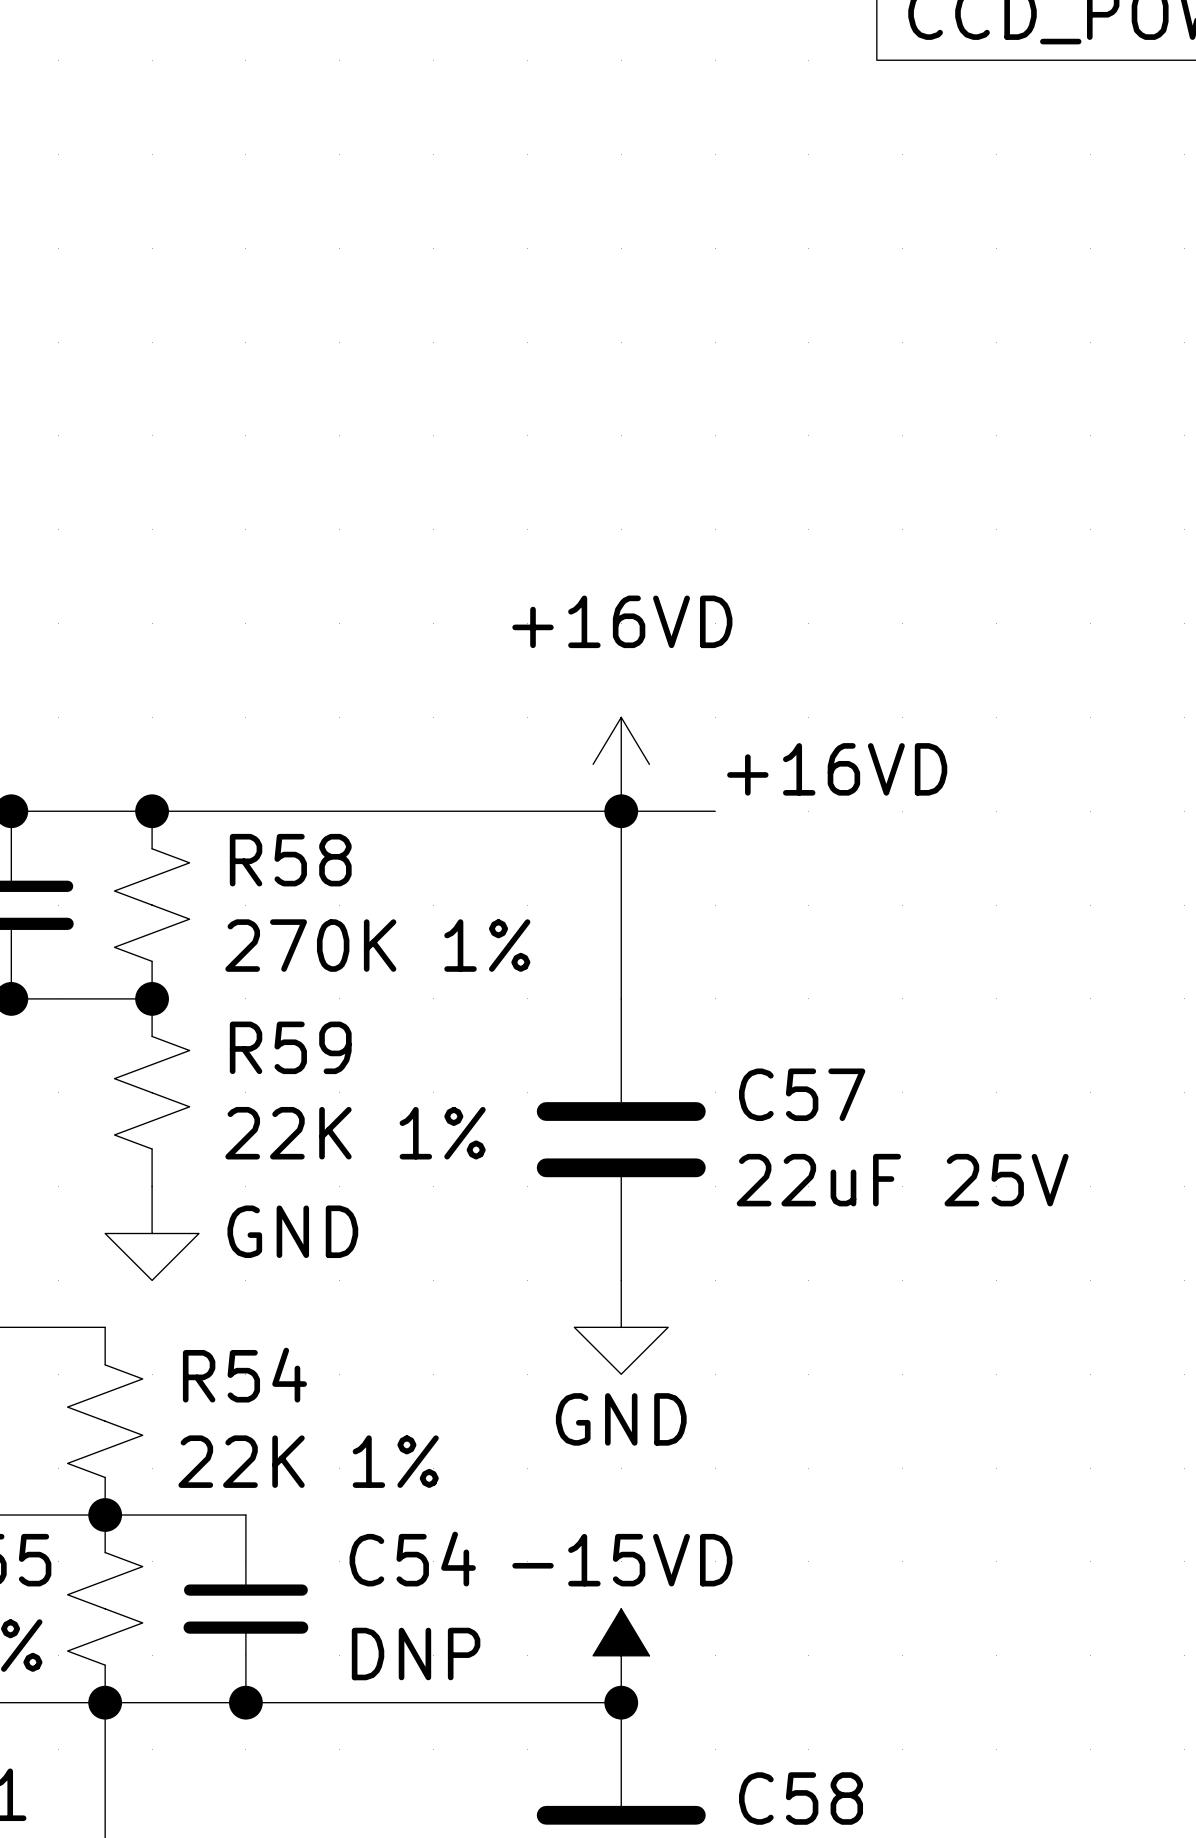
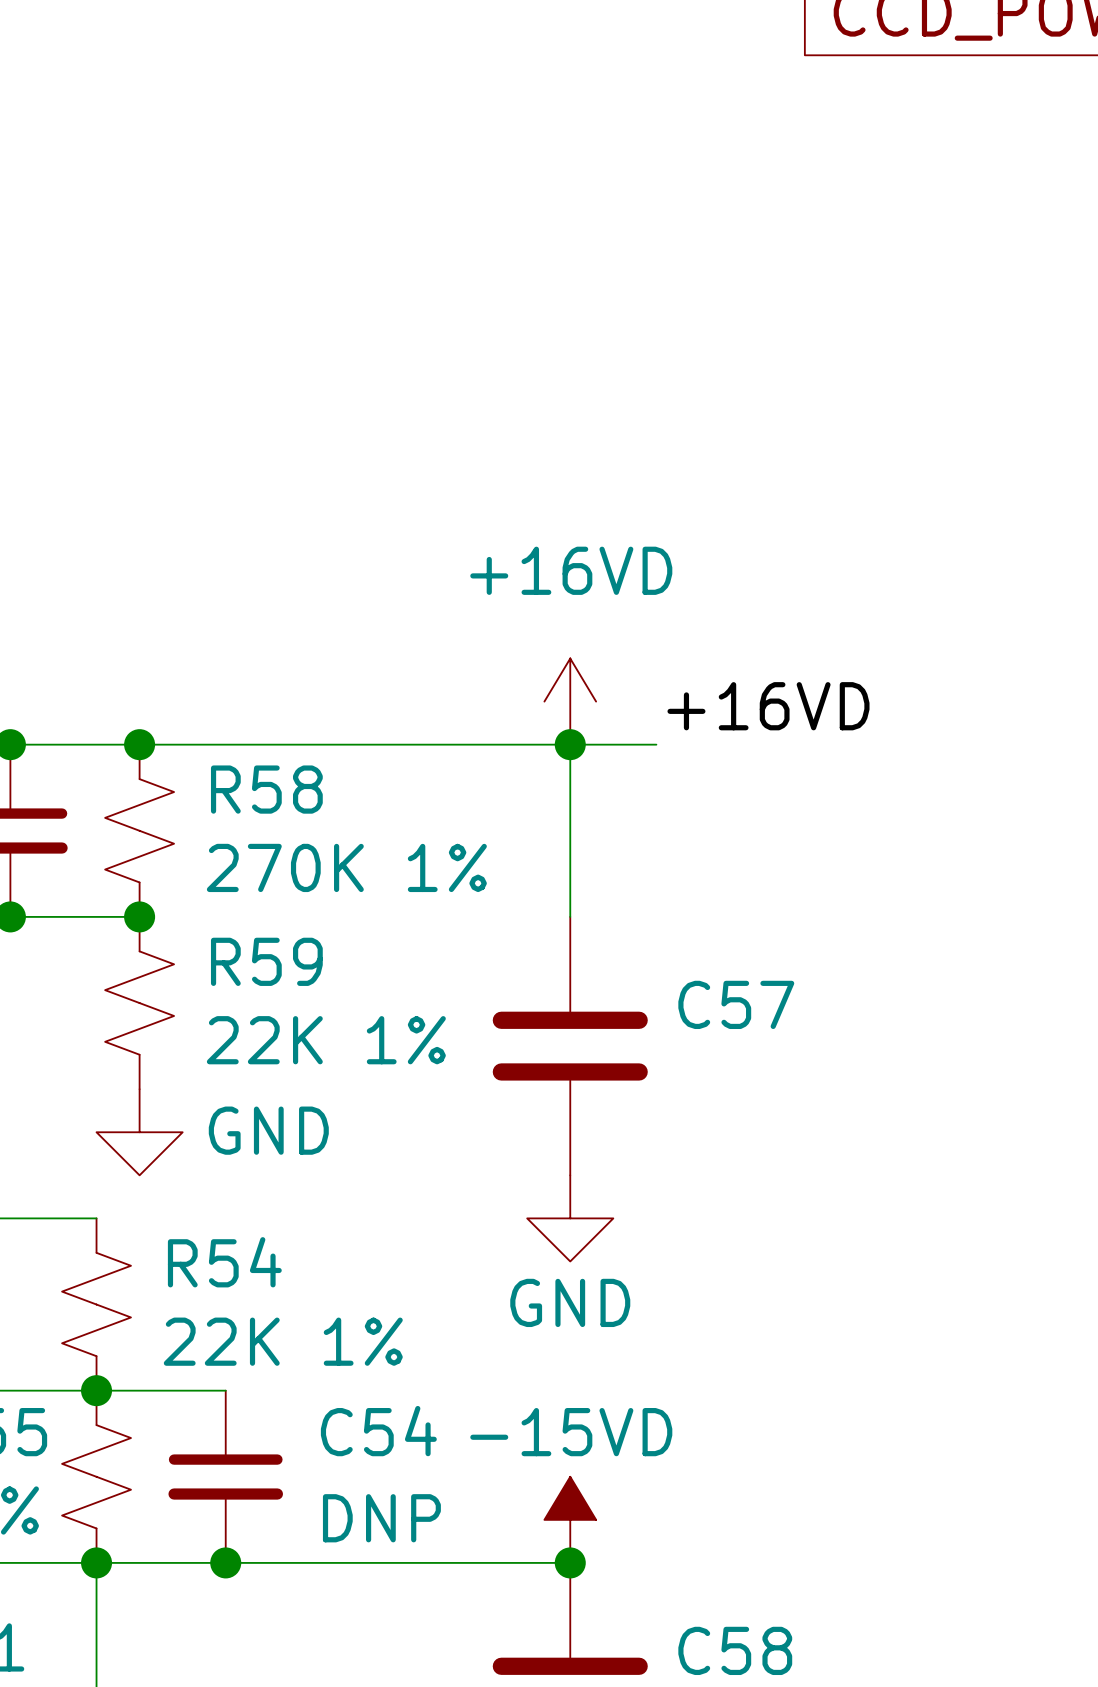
C57 value: 22uF 25V (902, 1180) -> none

